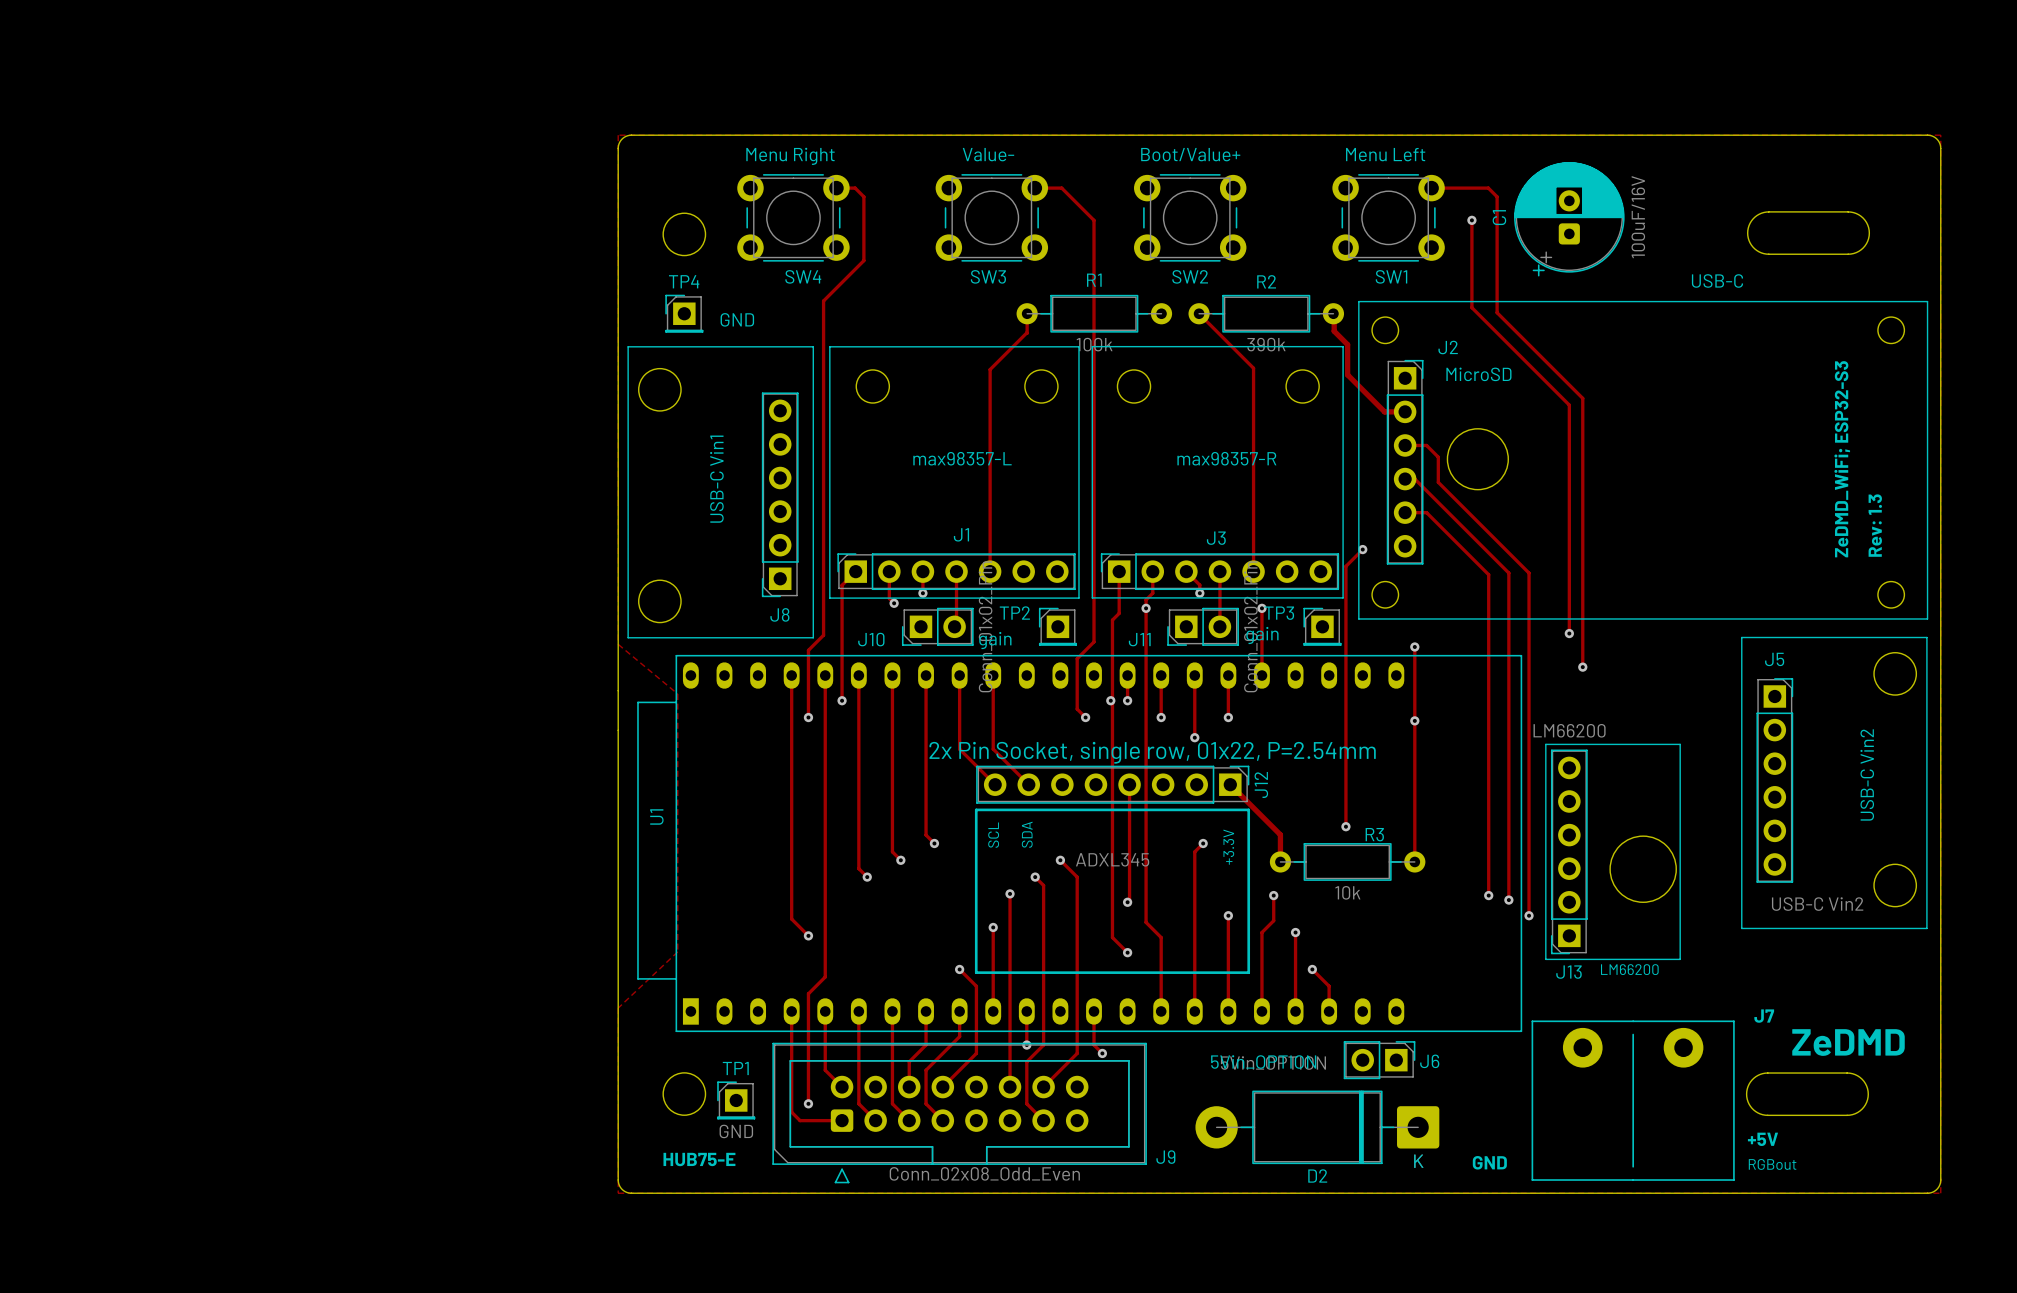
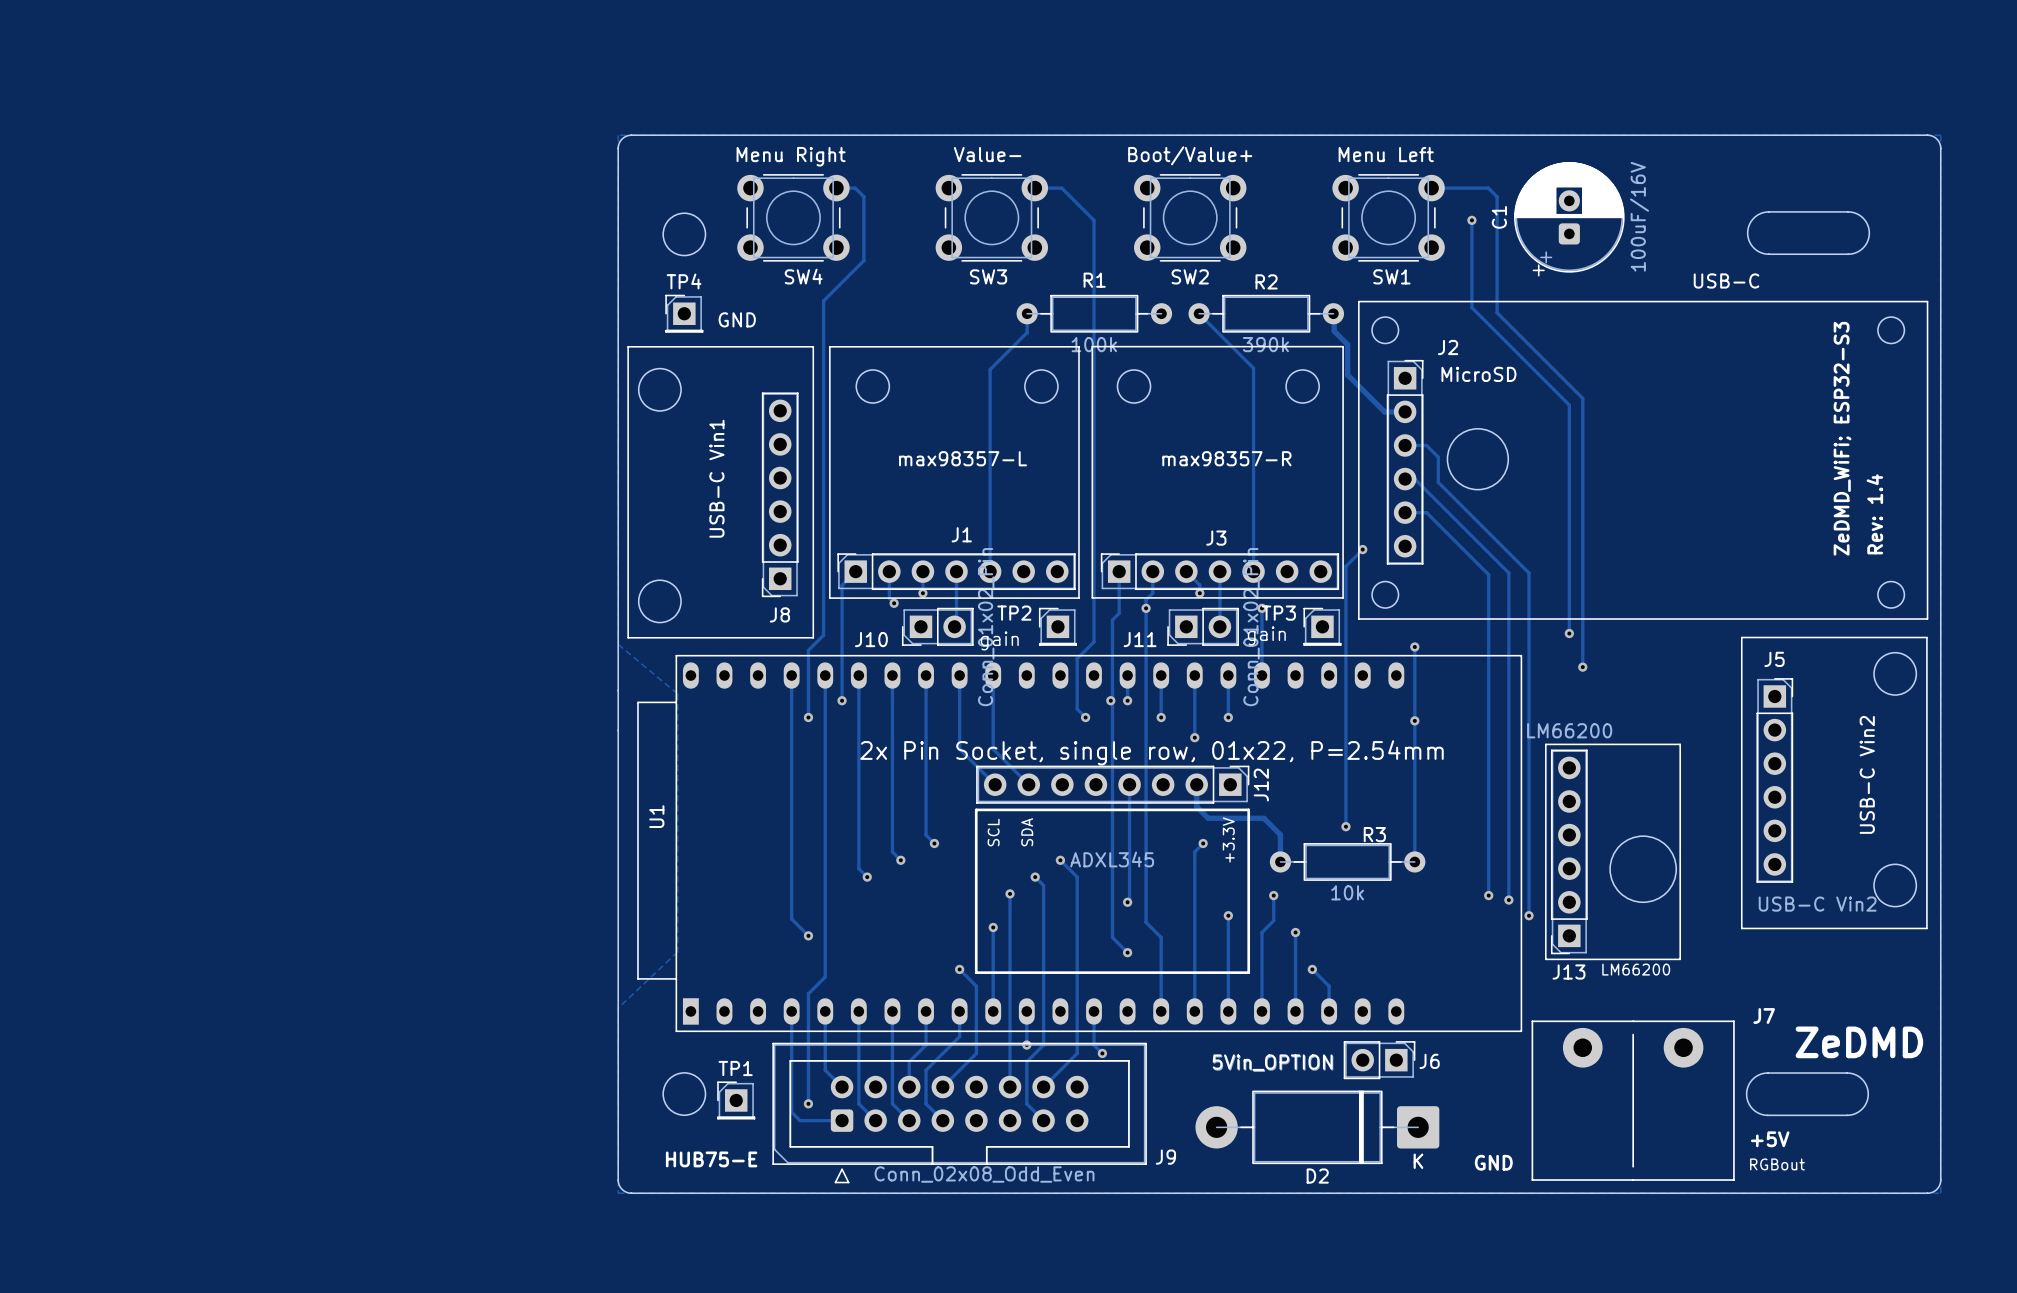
text: Rev: 1.3 (1875, 525) -> Rev: 1.4 (1874, 514)
track: (1230, 784) (1263, 818) -> (1196, 784) (1196, 806) (1208, 818) (1263, 818)
TP1 value: GND (736, 1131) -> none

